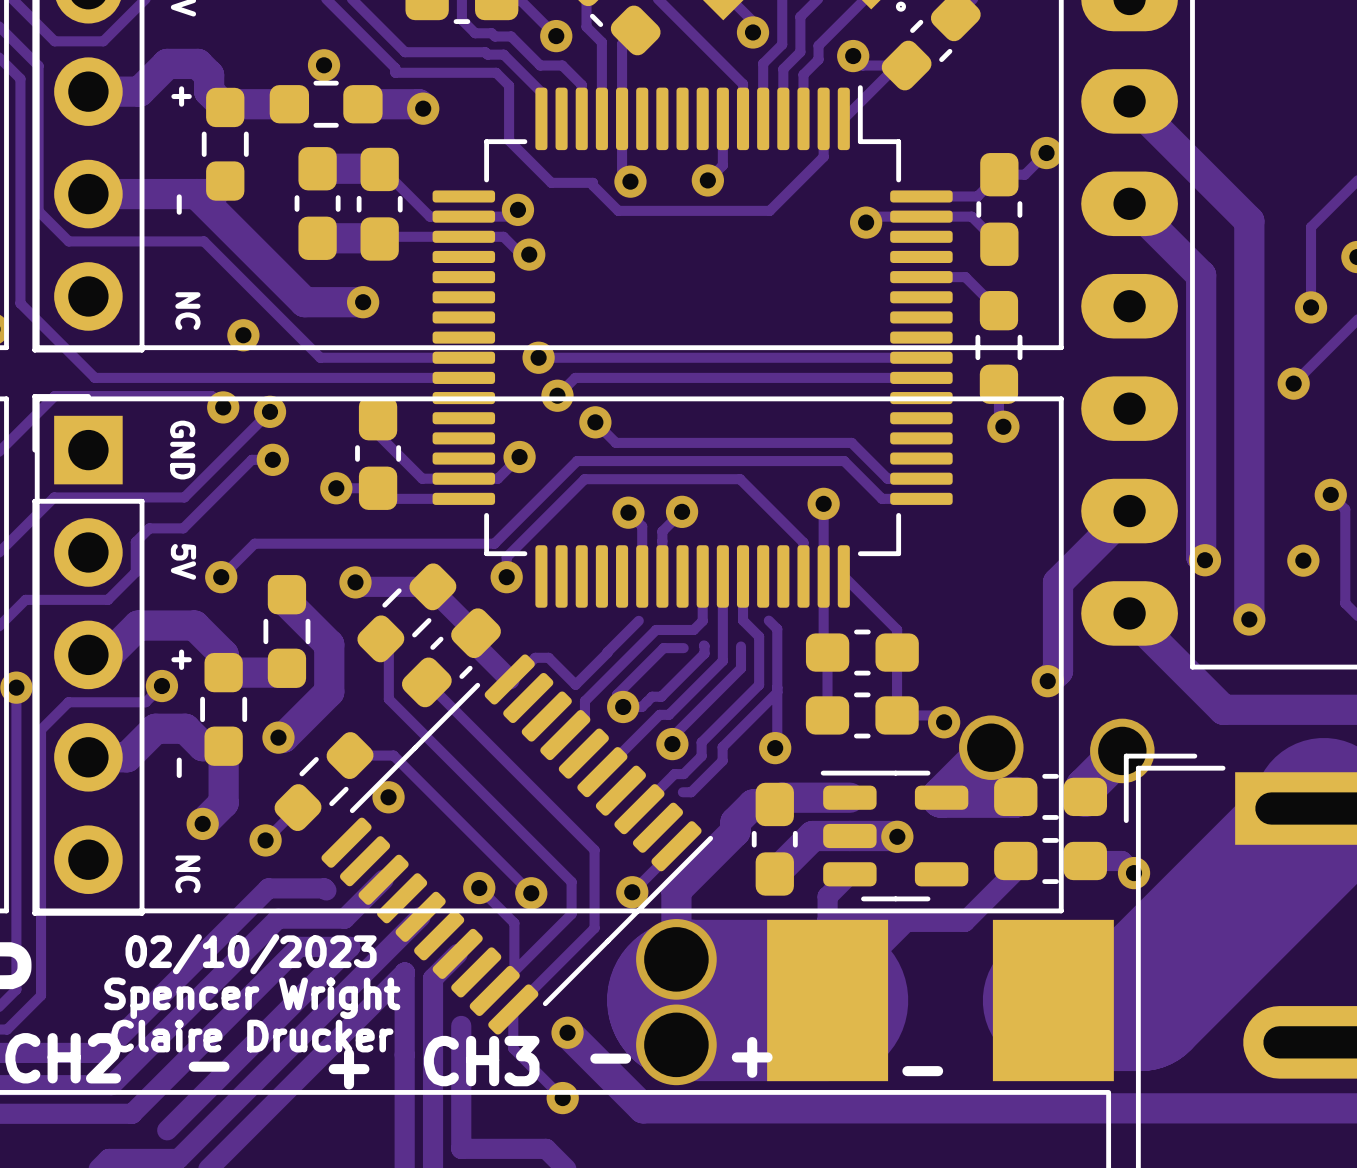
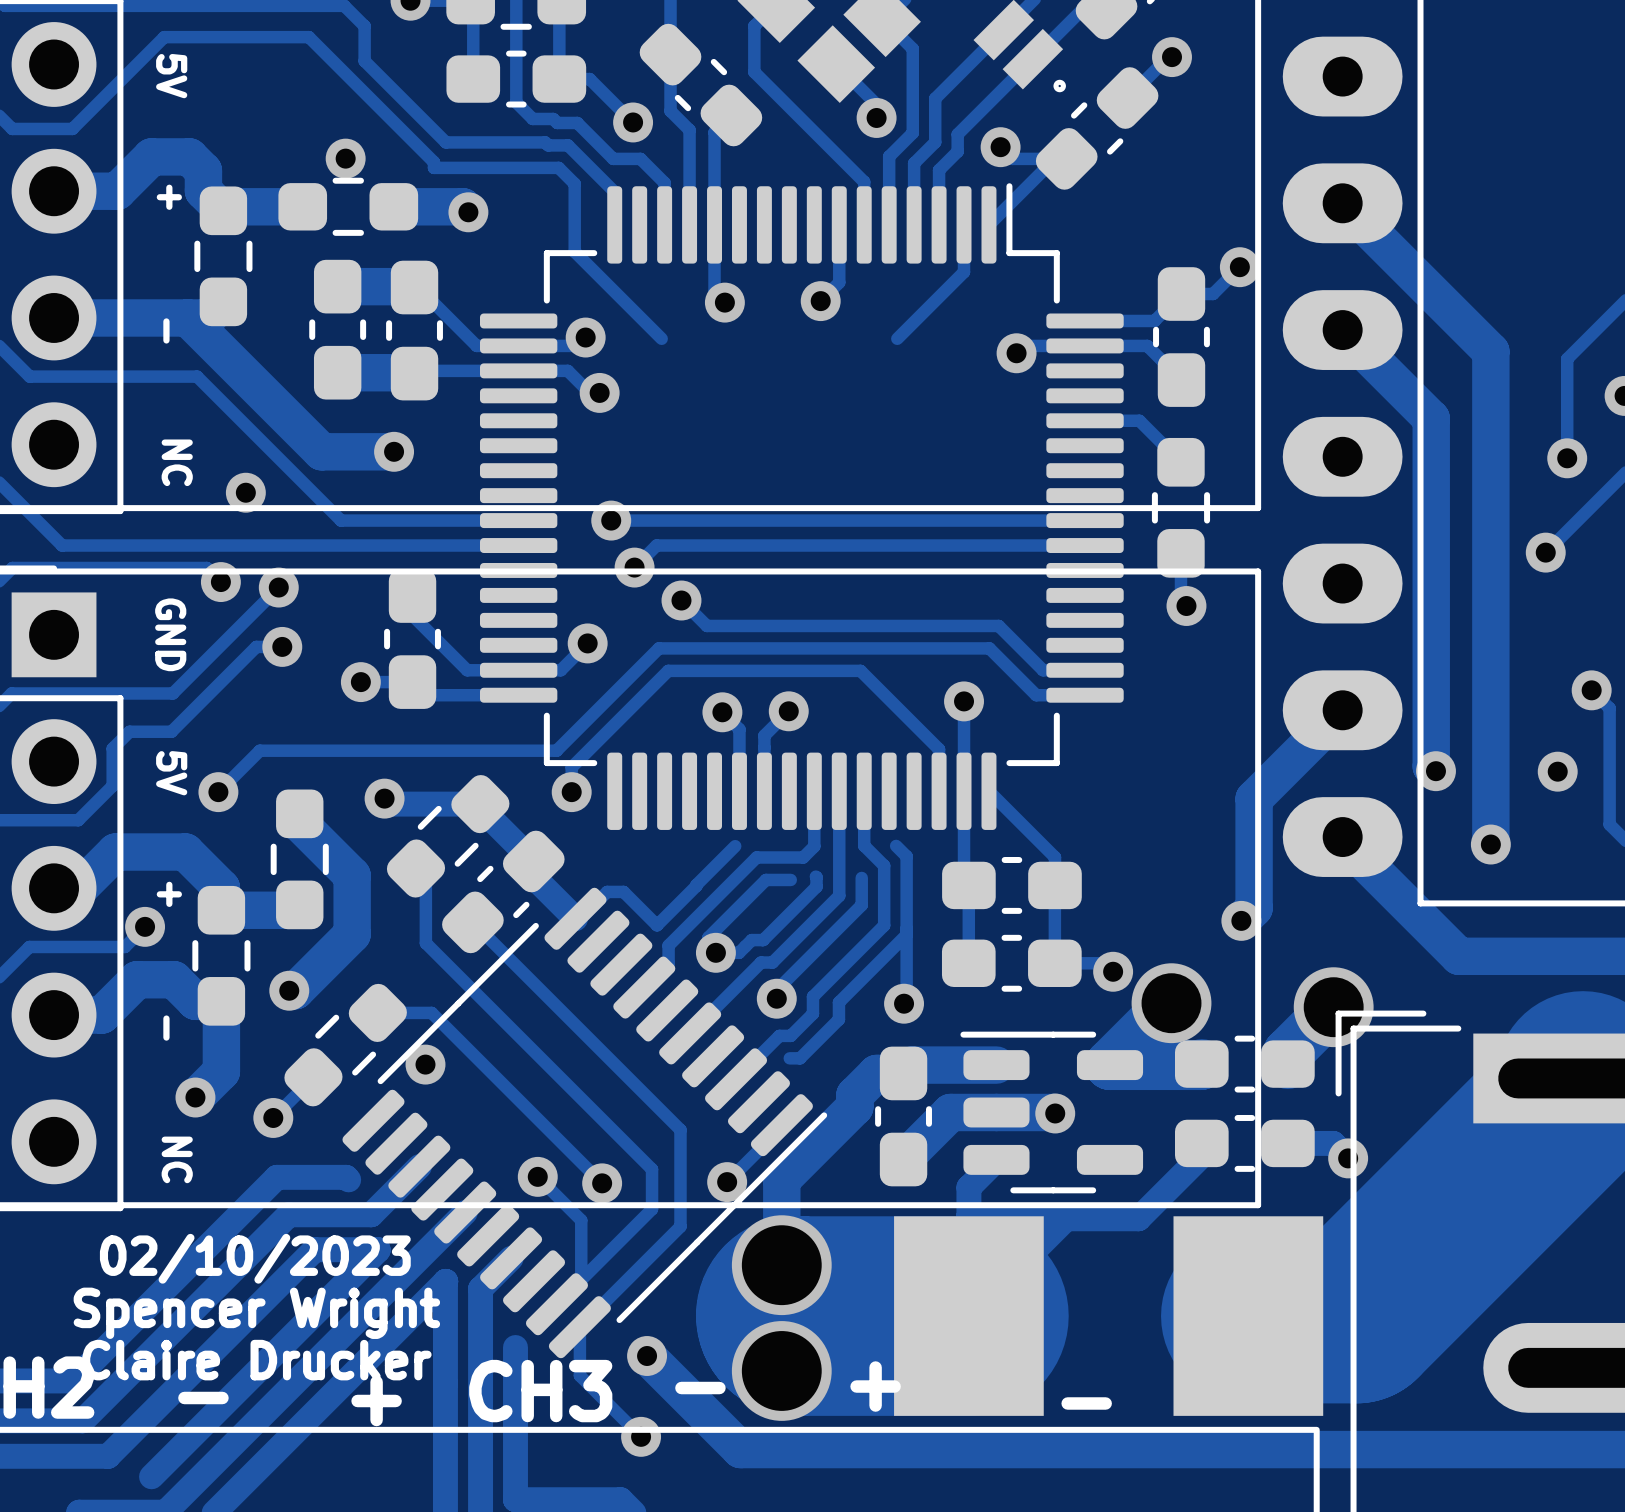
track: (551, 182) (592, 182) (592, 185) (618, 210) (769, 210) -> (627, 304) (661, 338)

